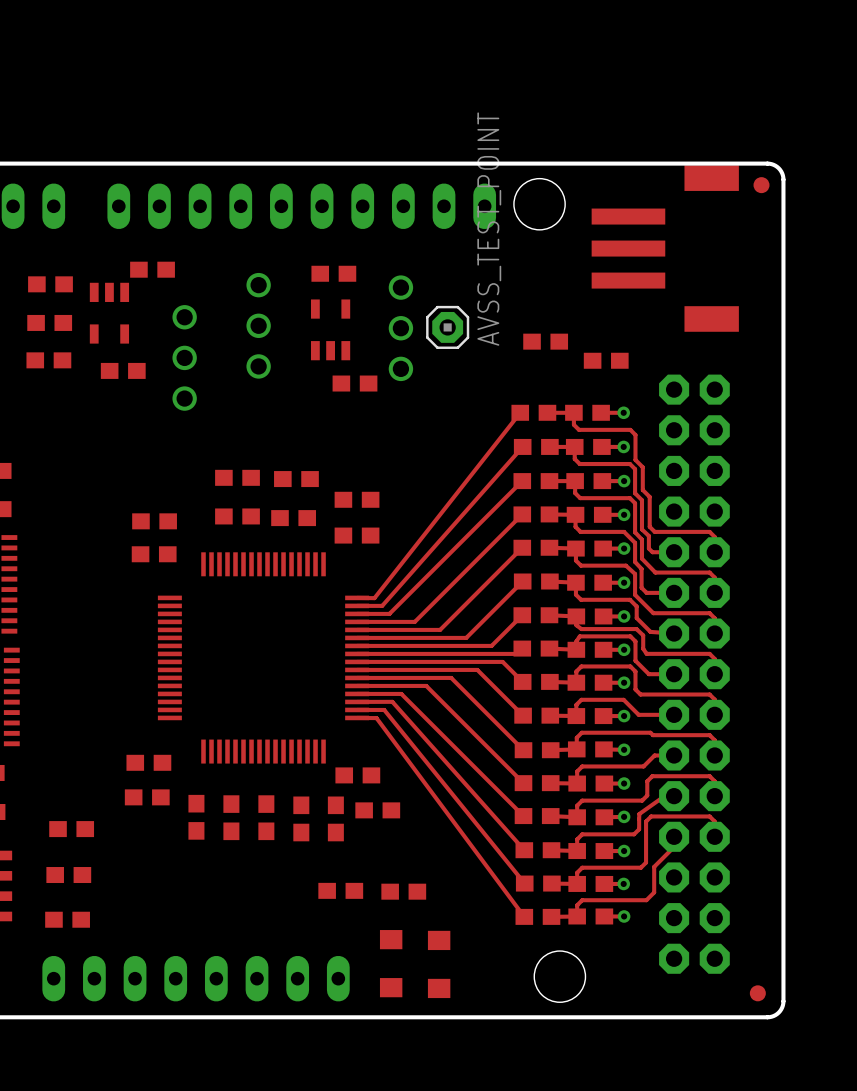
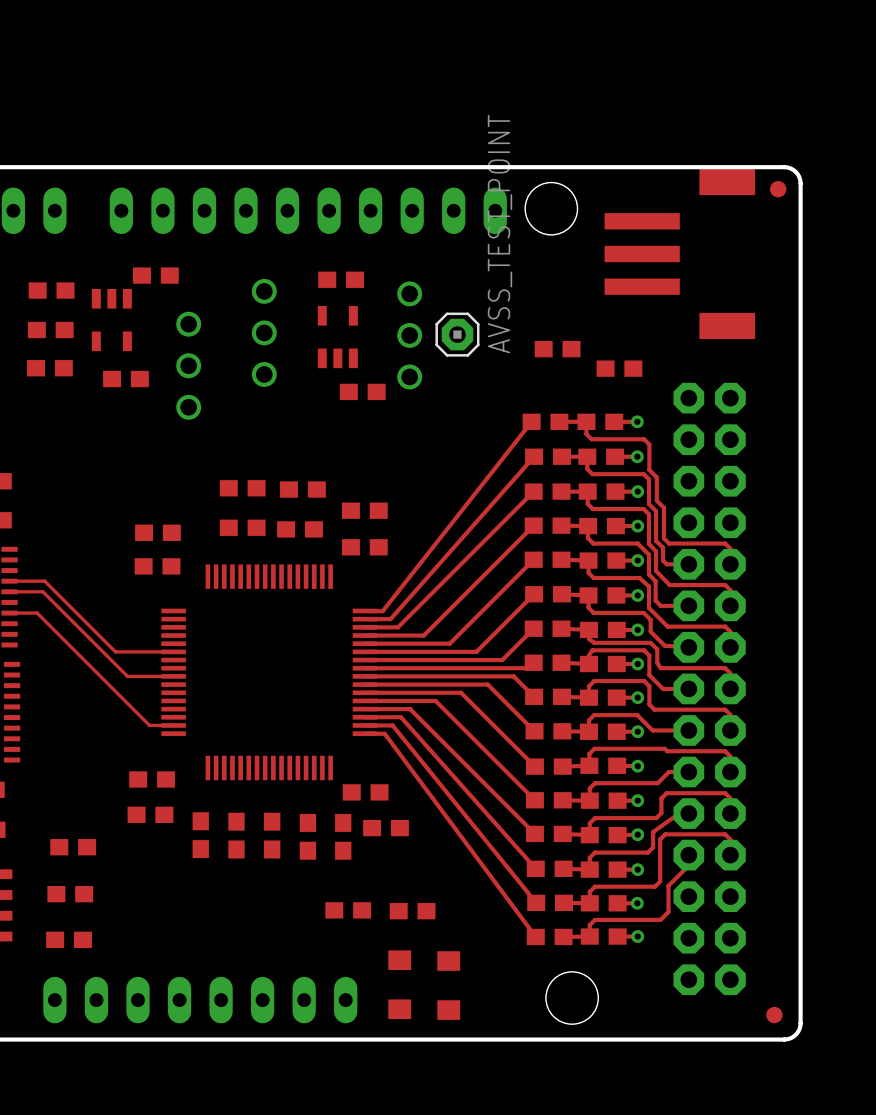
top track: none -> (9, 581) (44, 581) (115, 651) (173, 651)
top track: none -> (9, 591) (42, 591) (127, 676) (173, 676)
top track: none -> (9, 613) (37, 613) (149, 725) (173, 725)

